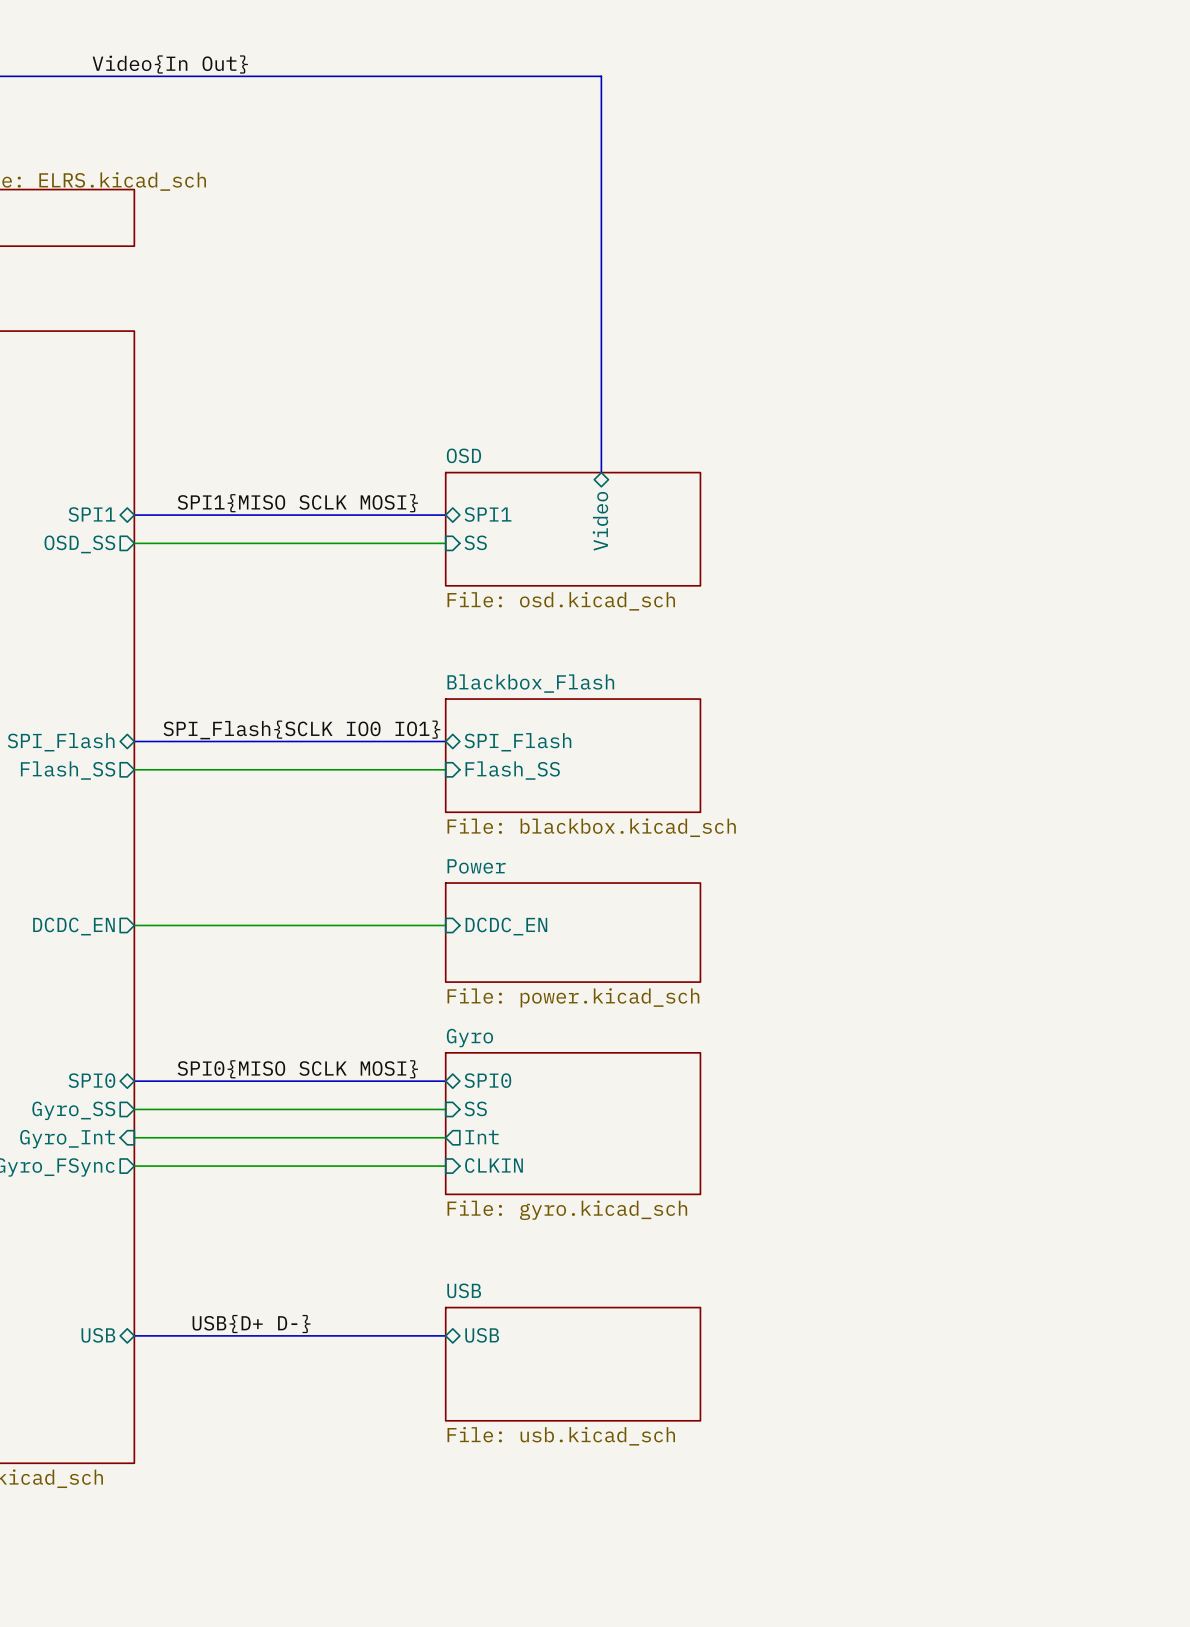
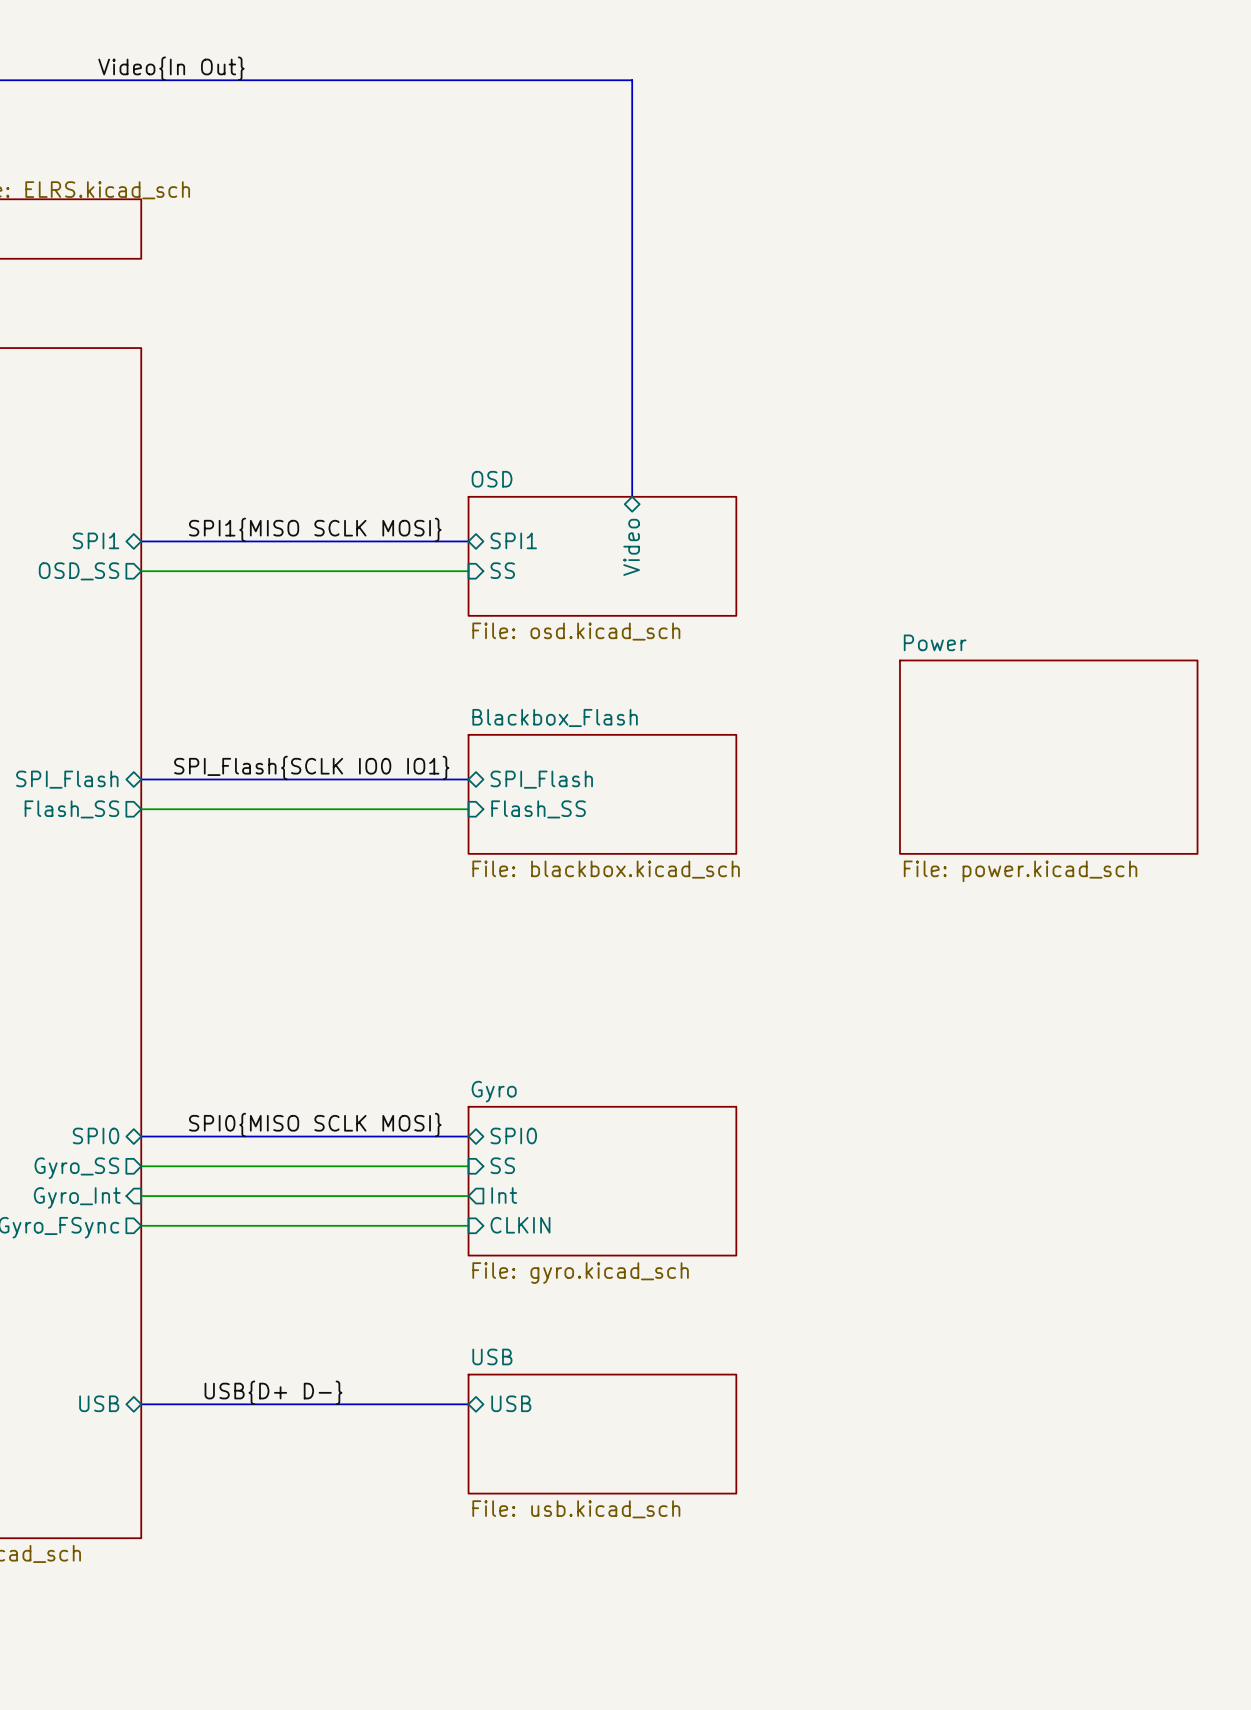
sheet Power: none -> File: power.kicad_sch (1048, 757)
wire: (134, 925) (445, 925) -> none
sheet pin: DCDC_EN (73, 926) -> none
sheet pin: DCDC_EN (506, 926) -> none
sheet Power: File: power.kicad_sch (573, 932) -> none

